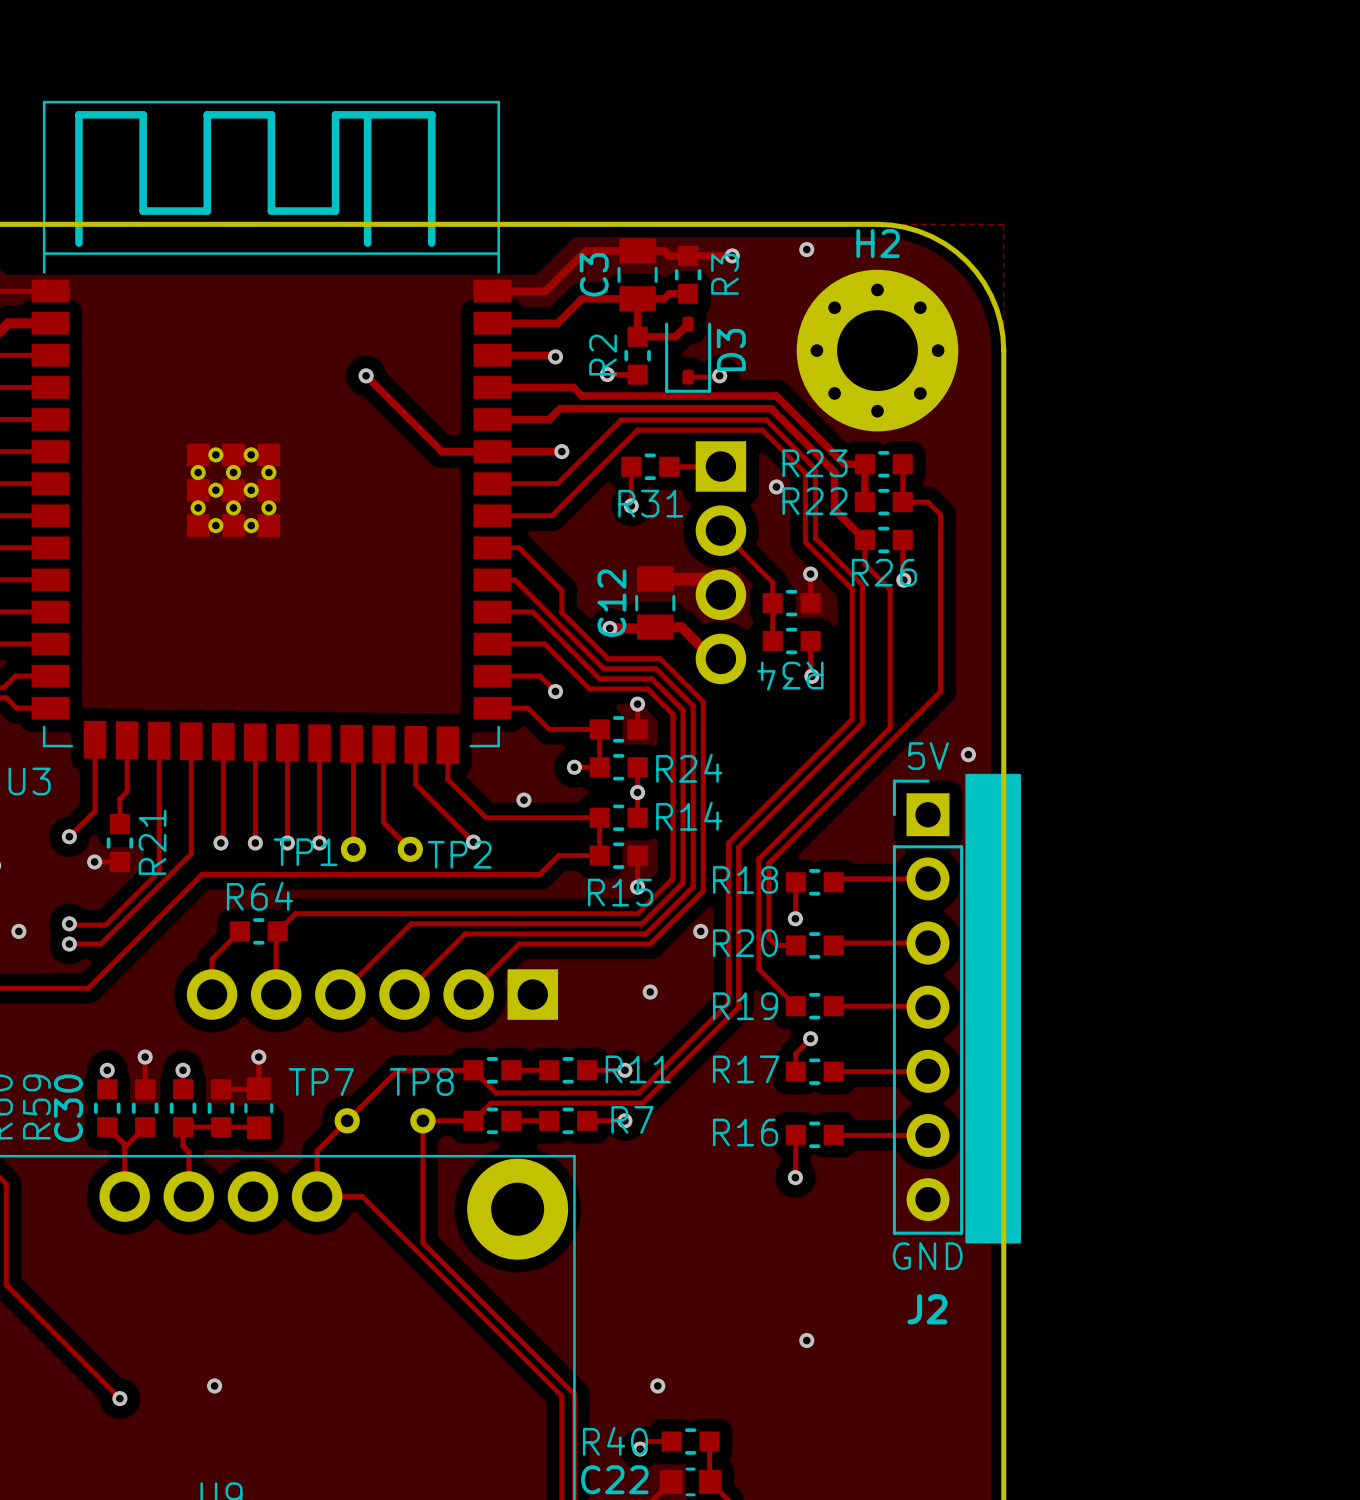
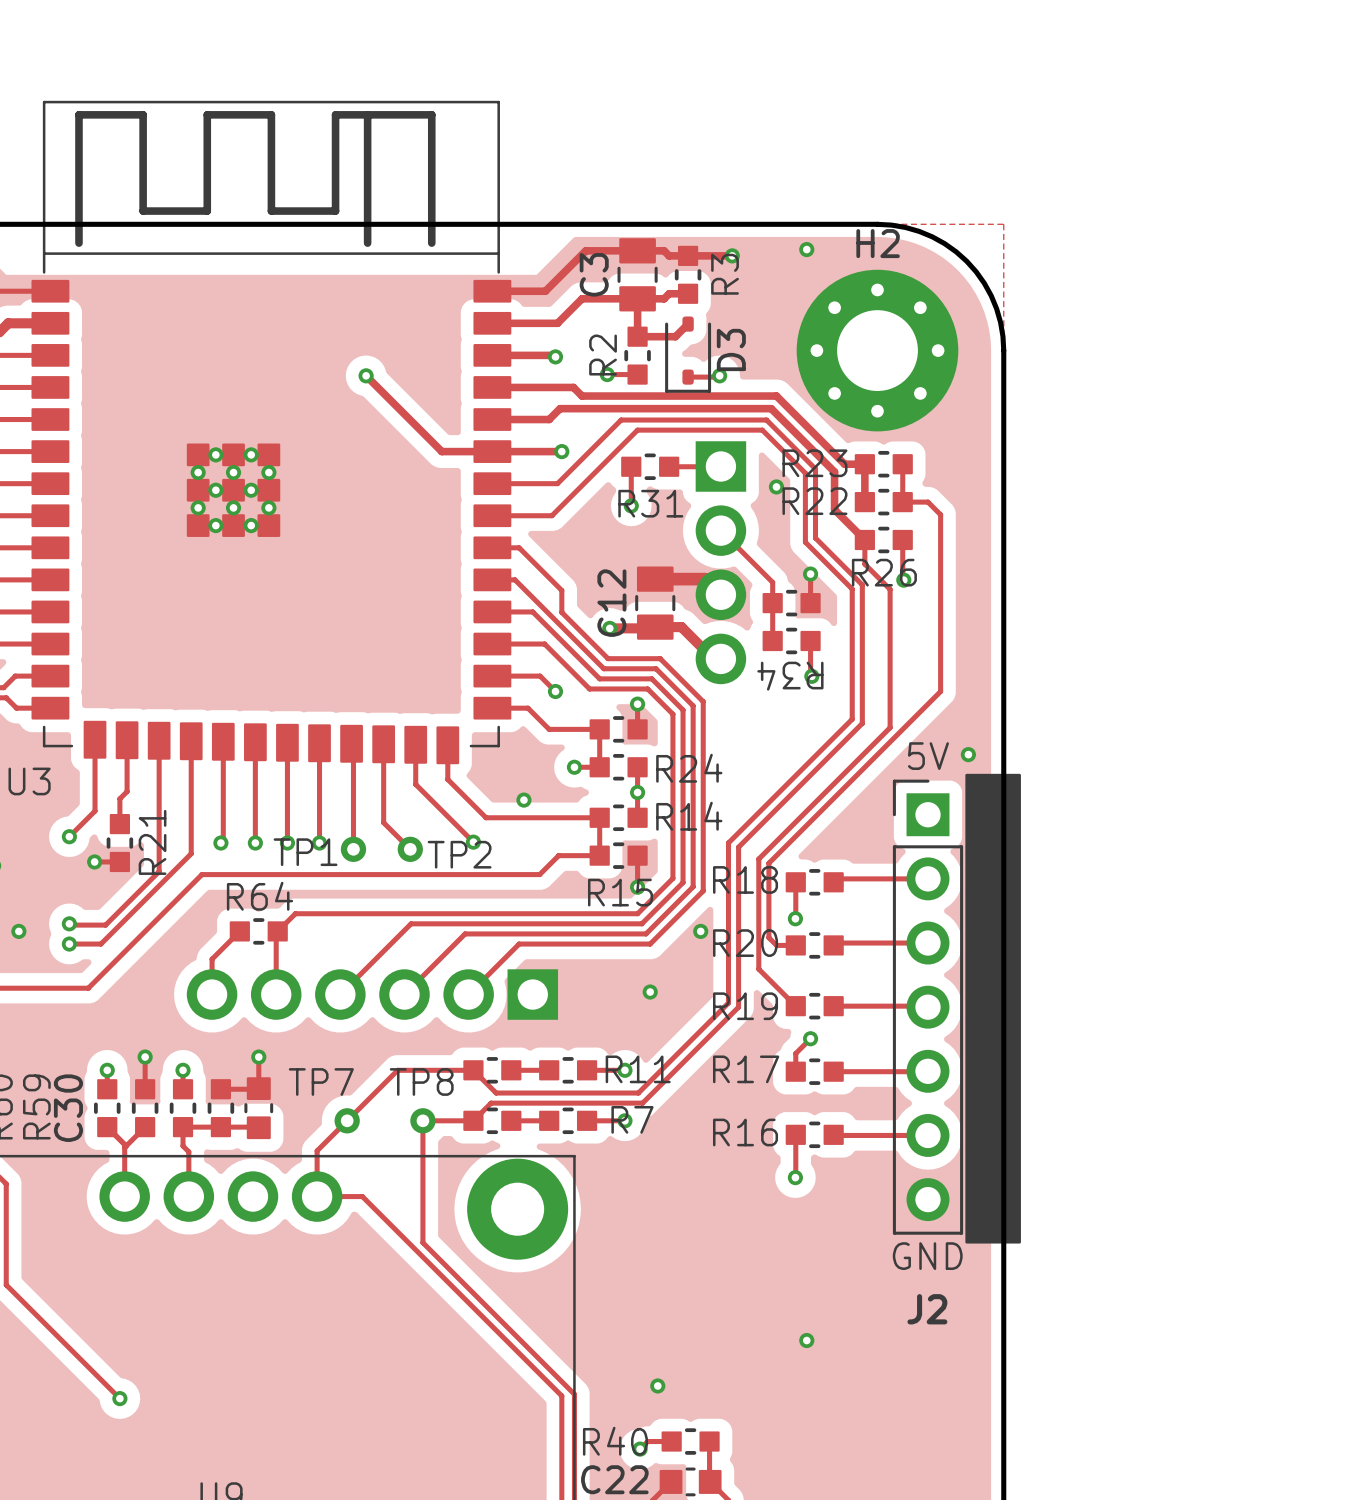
via: (214, 1385) -> none

